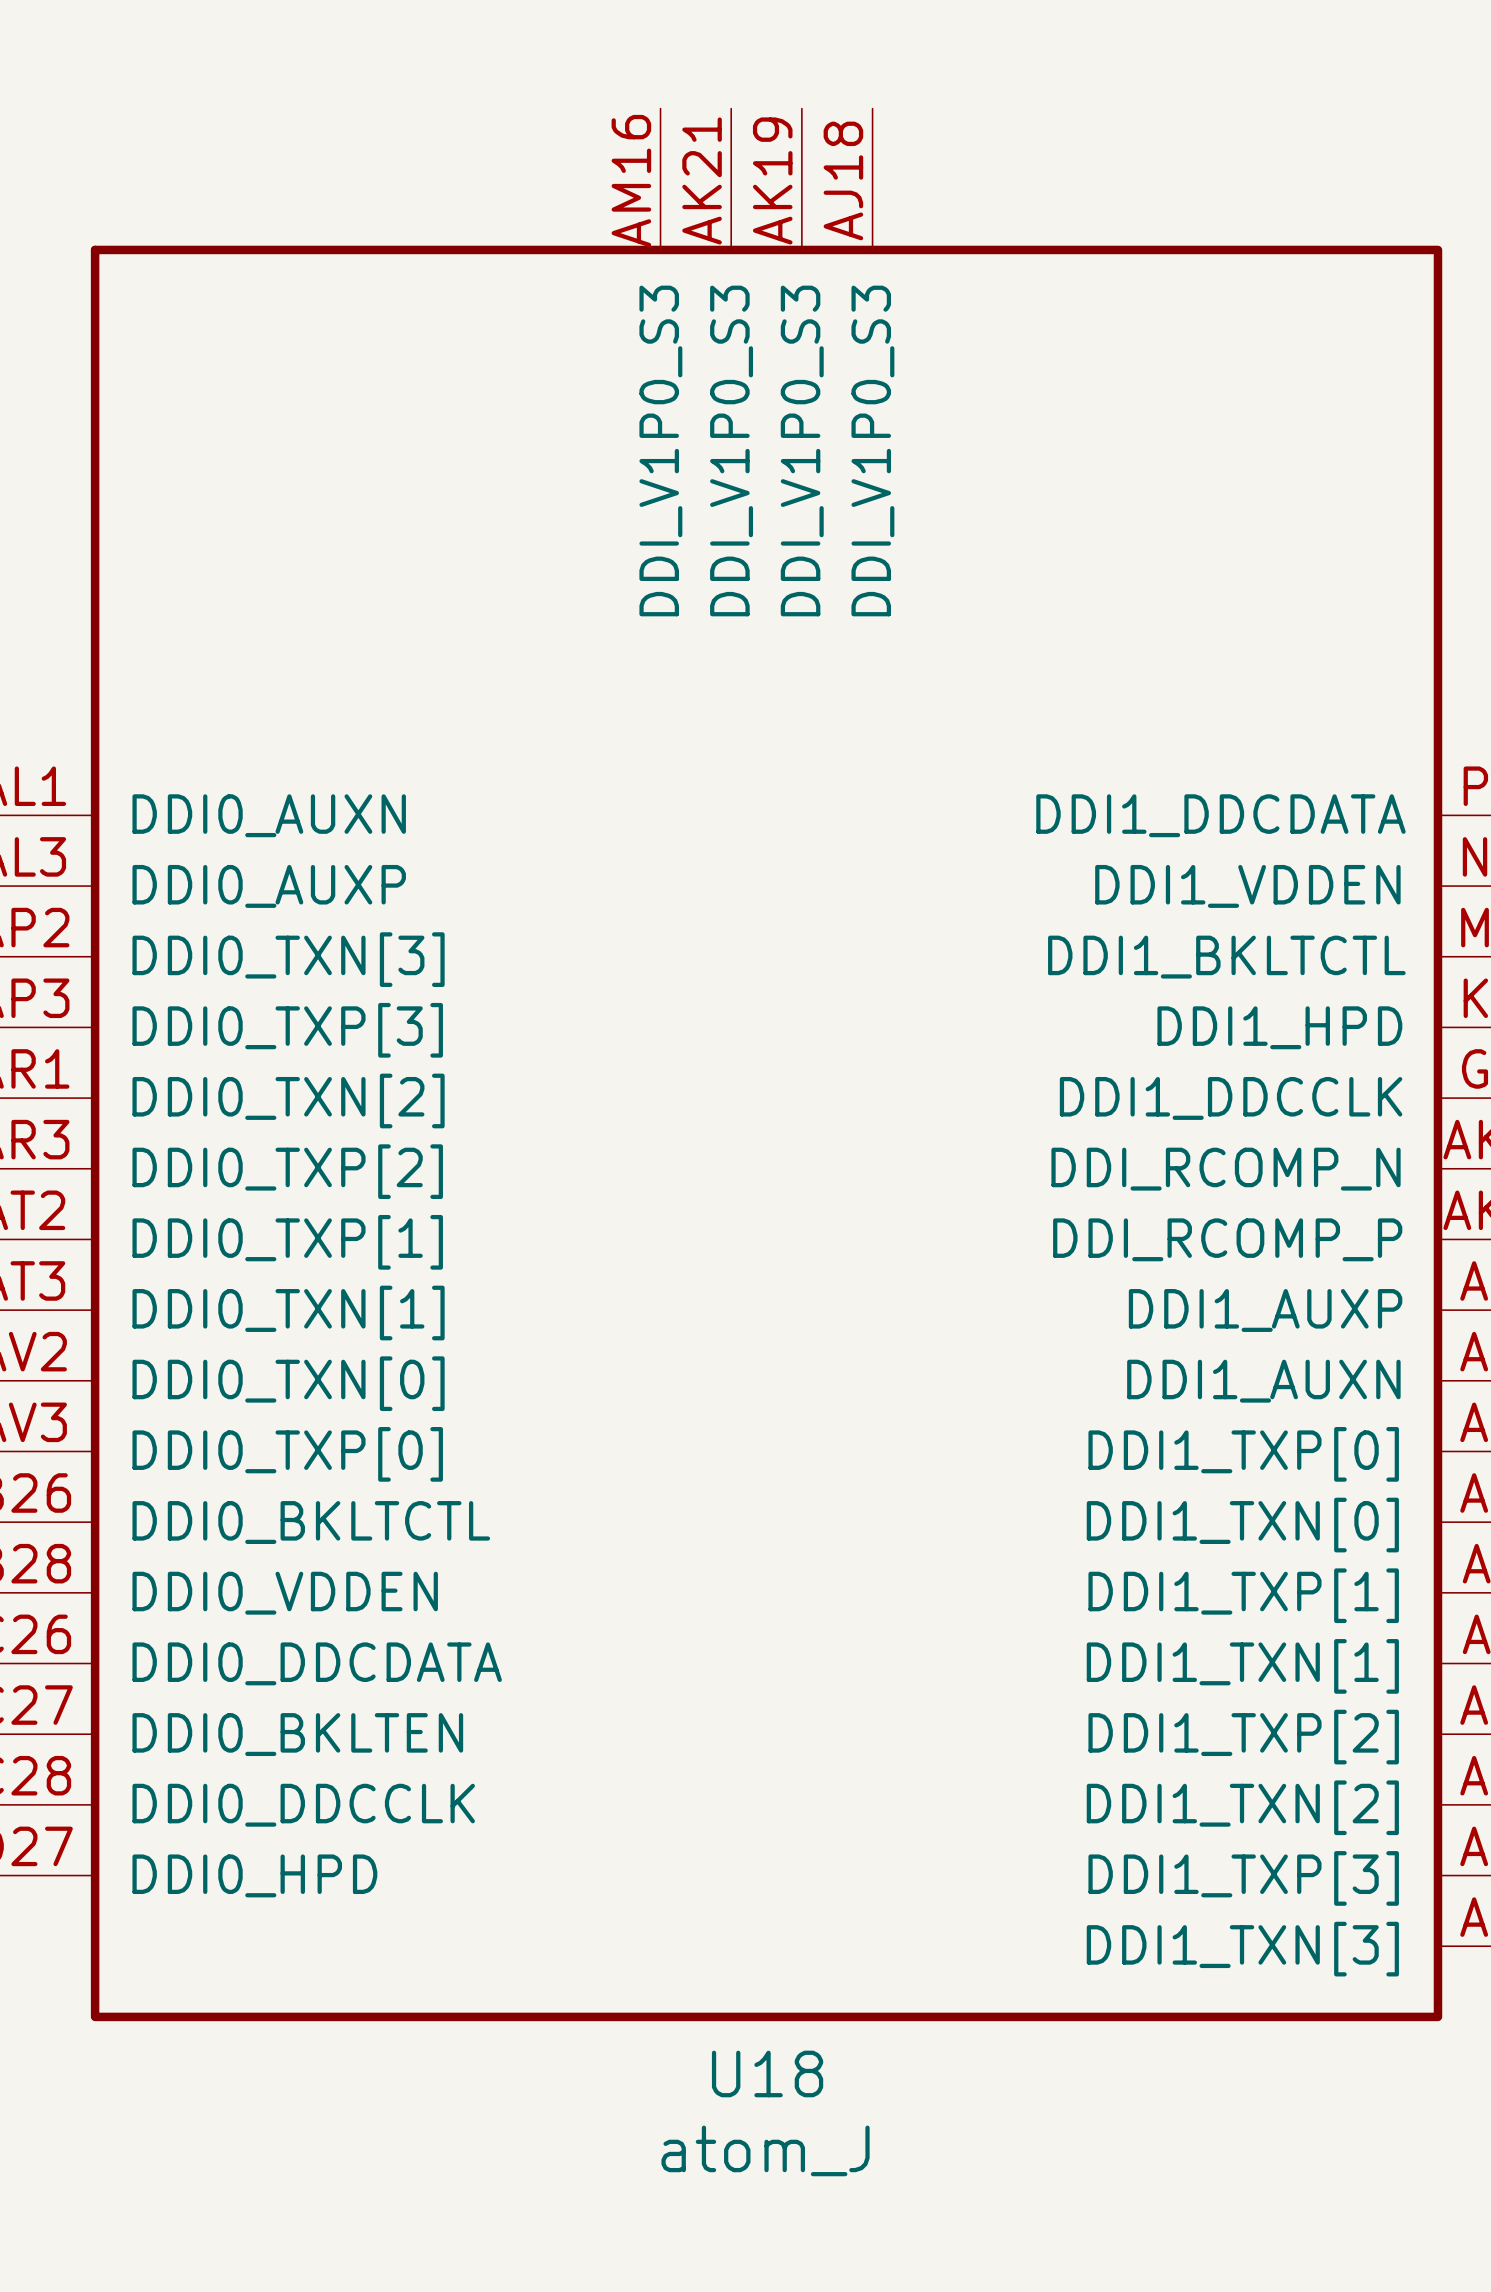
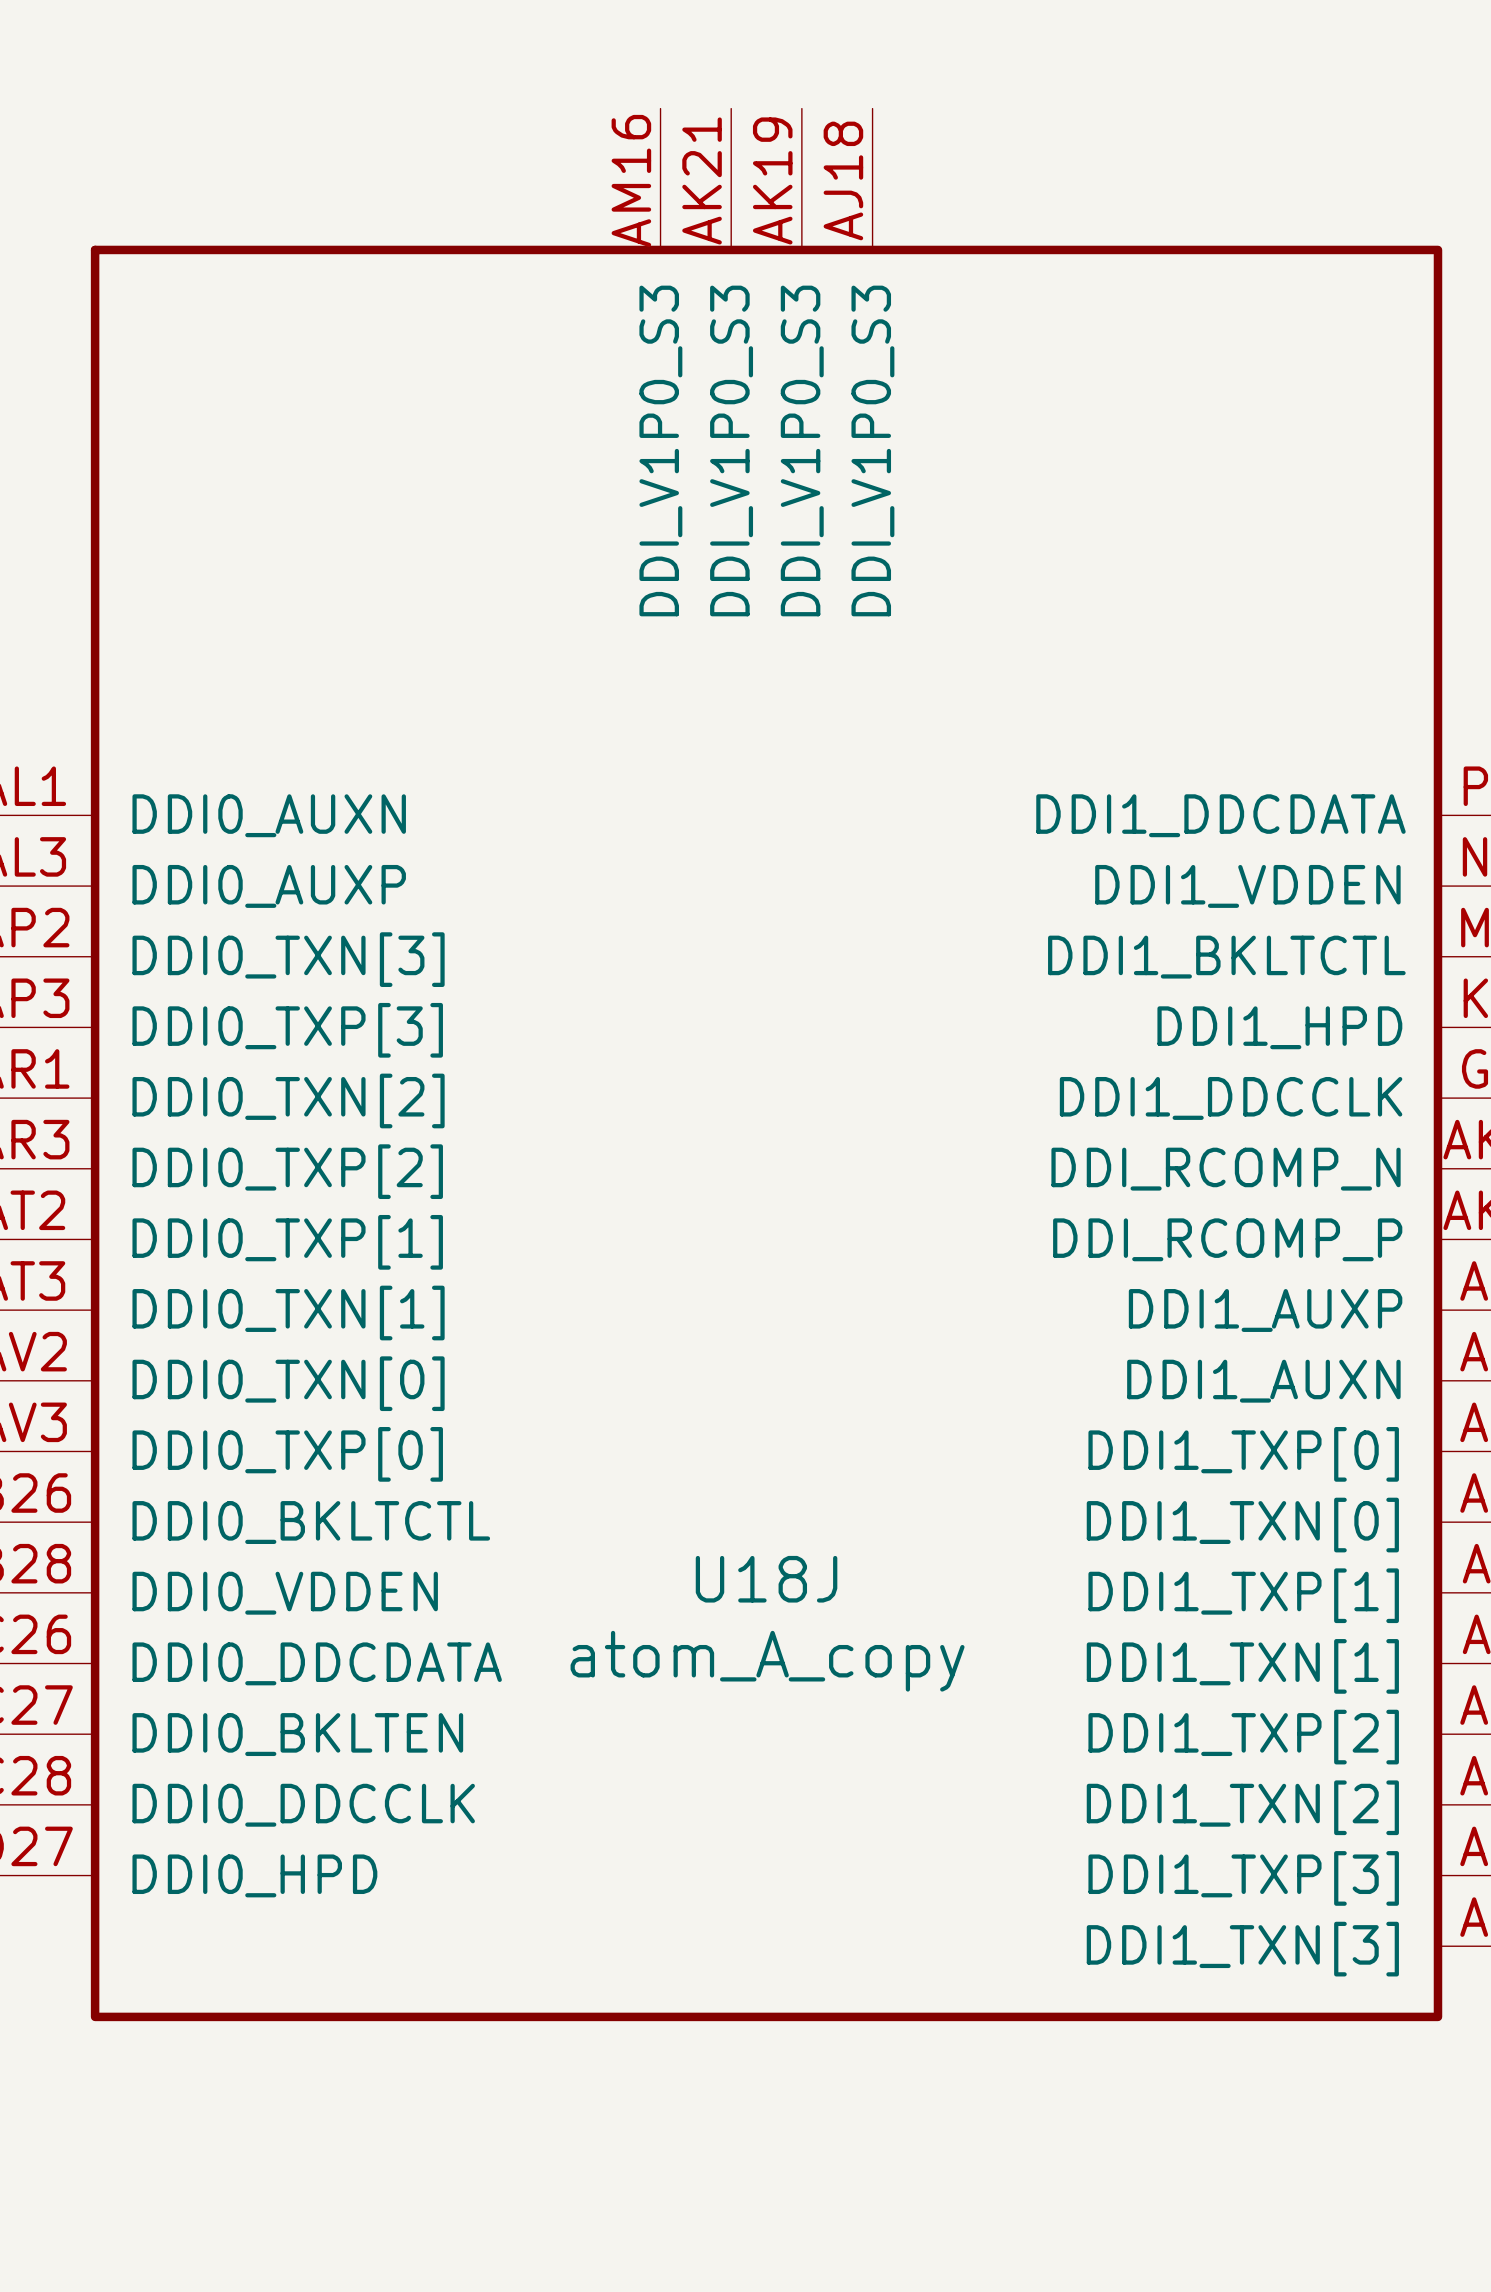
U18 name: U18 (767, 2073) -> U18J (766, 1579)
U18 value: atom_J (765, 2150) -> atom_A_copy (767, 1661)

